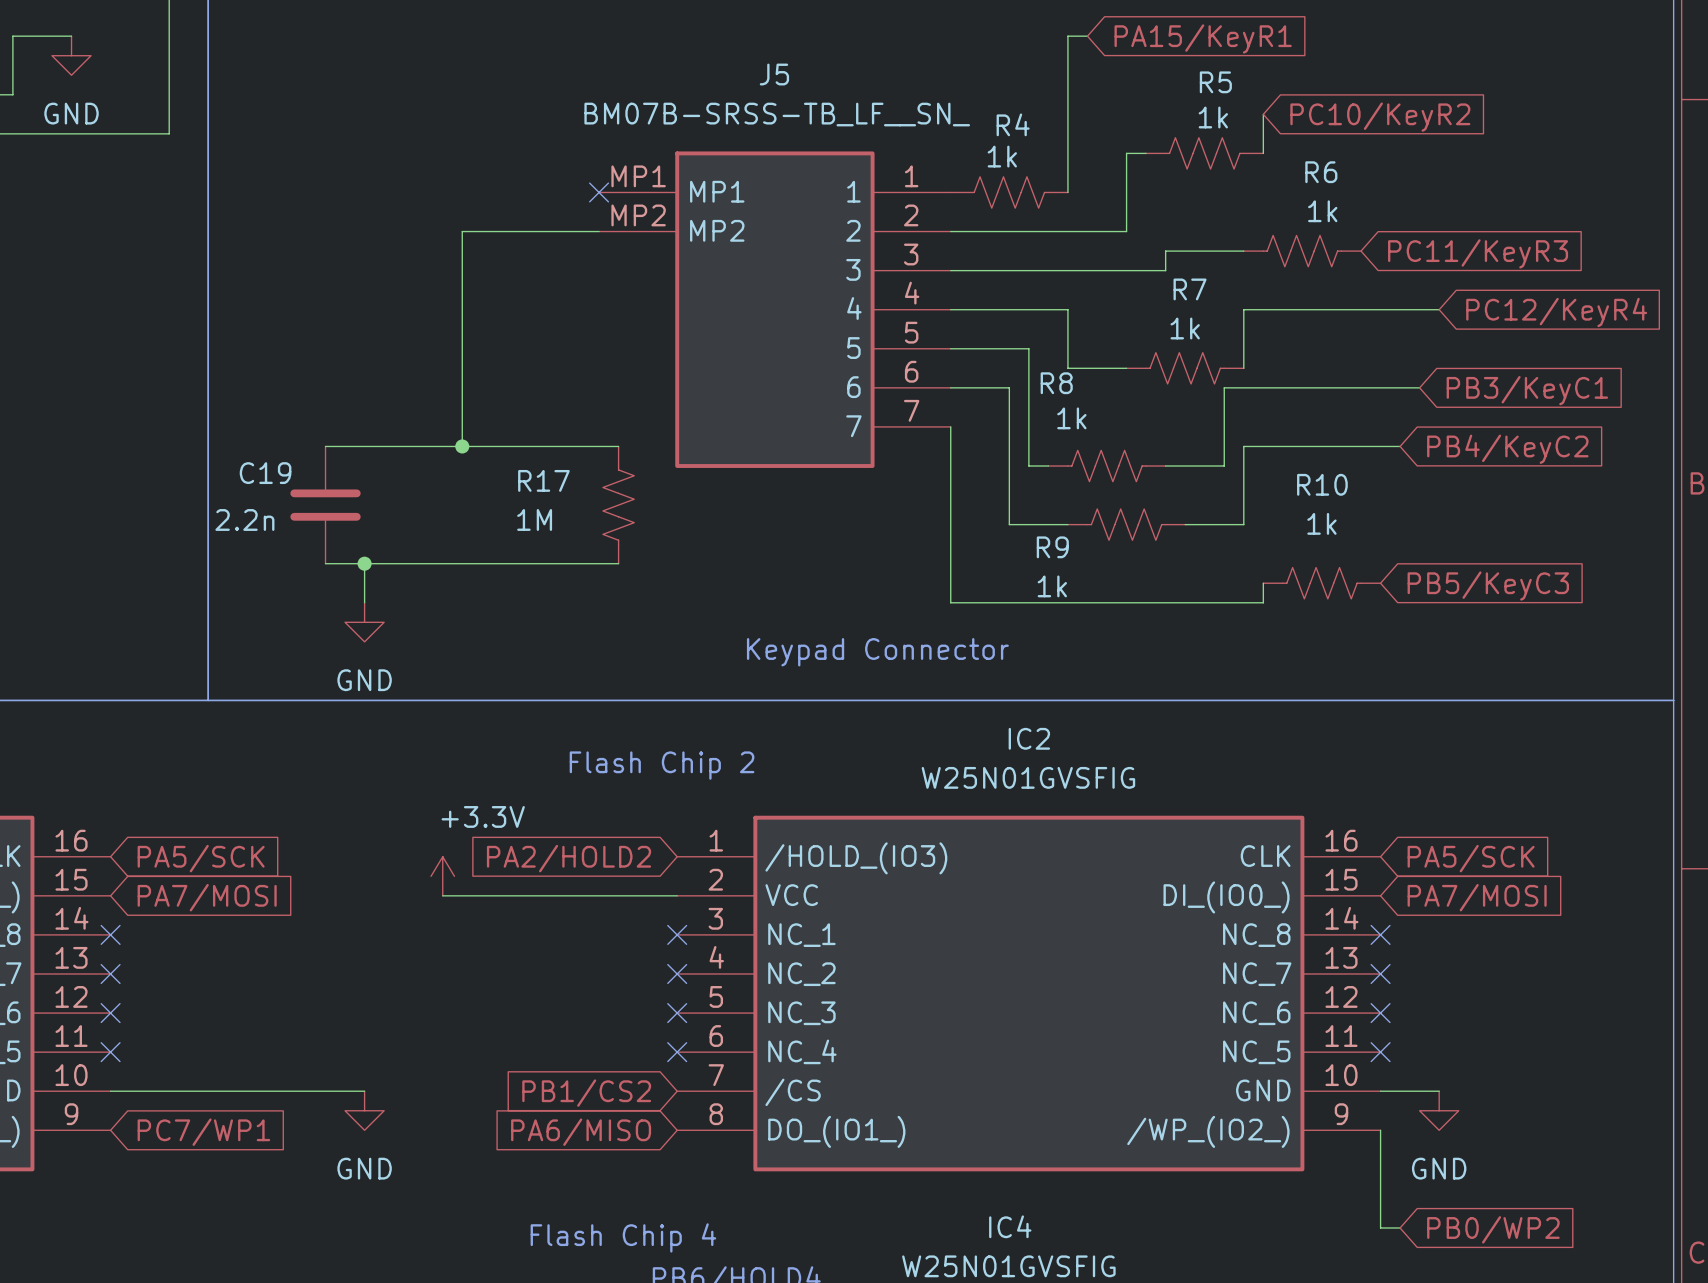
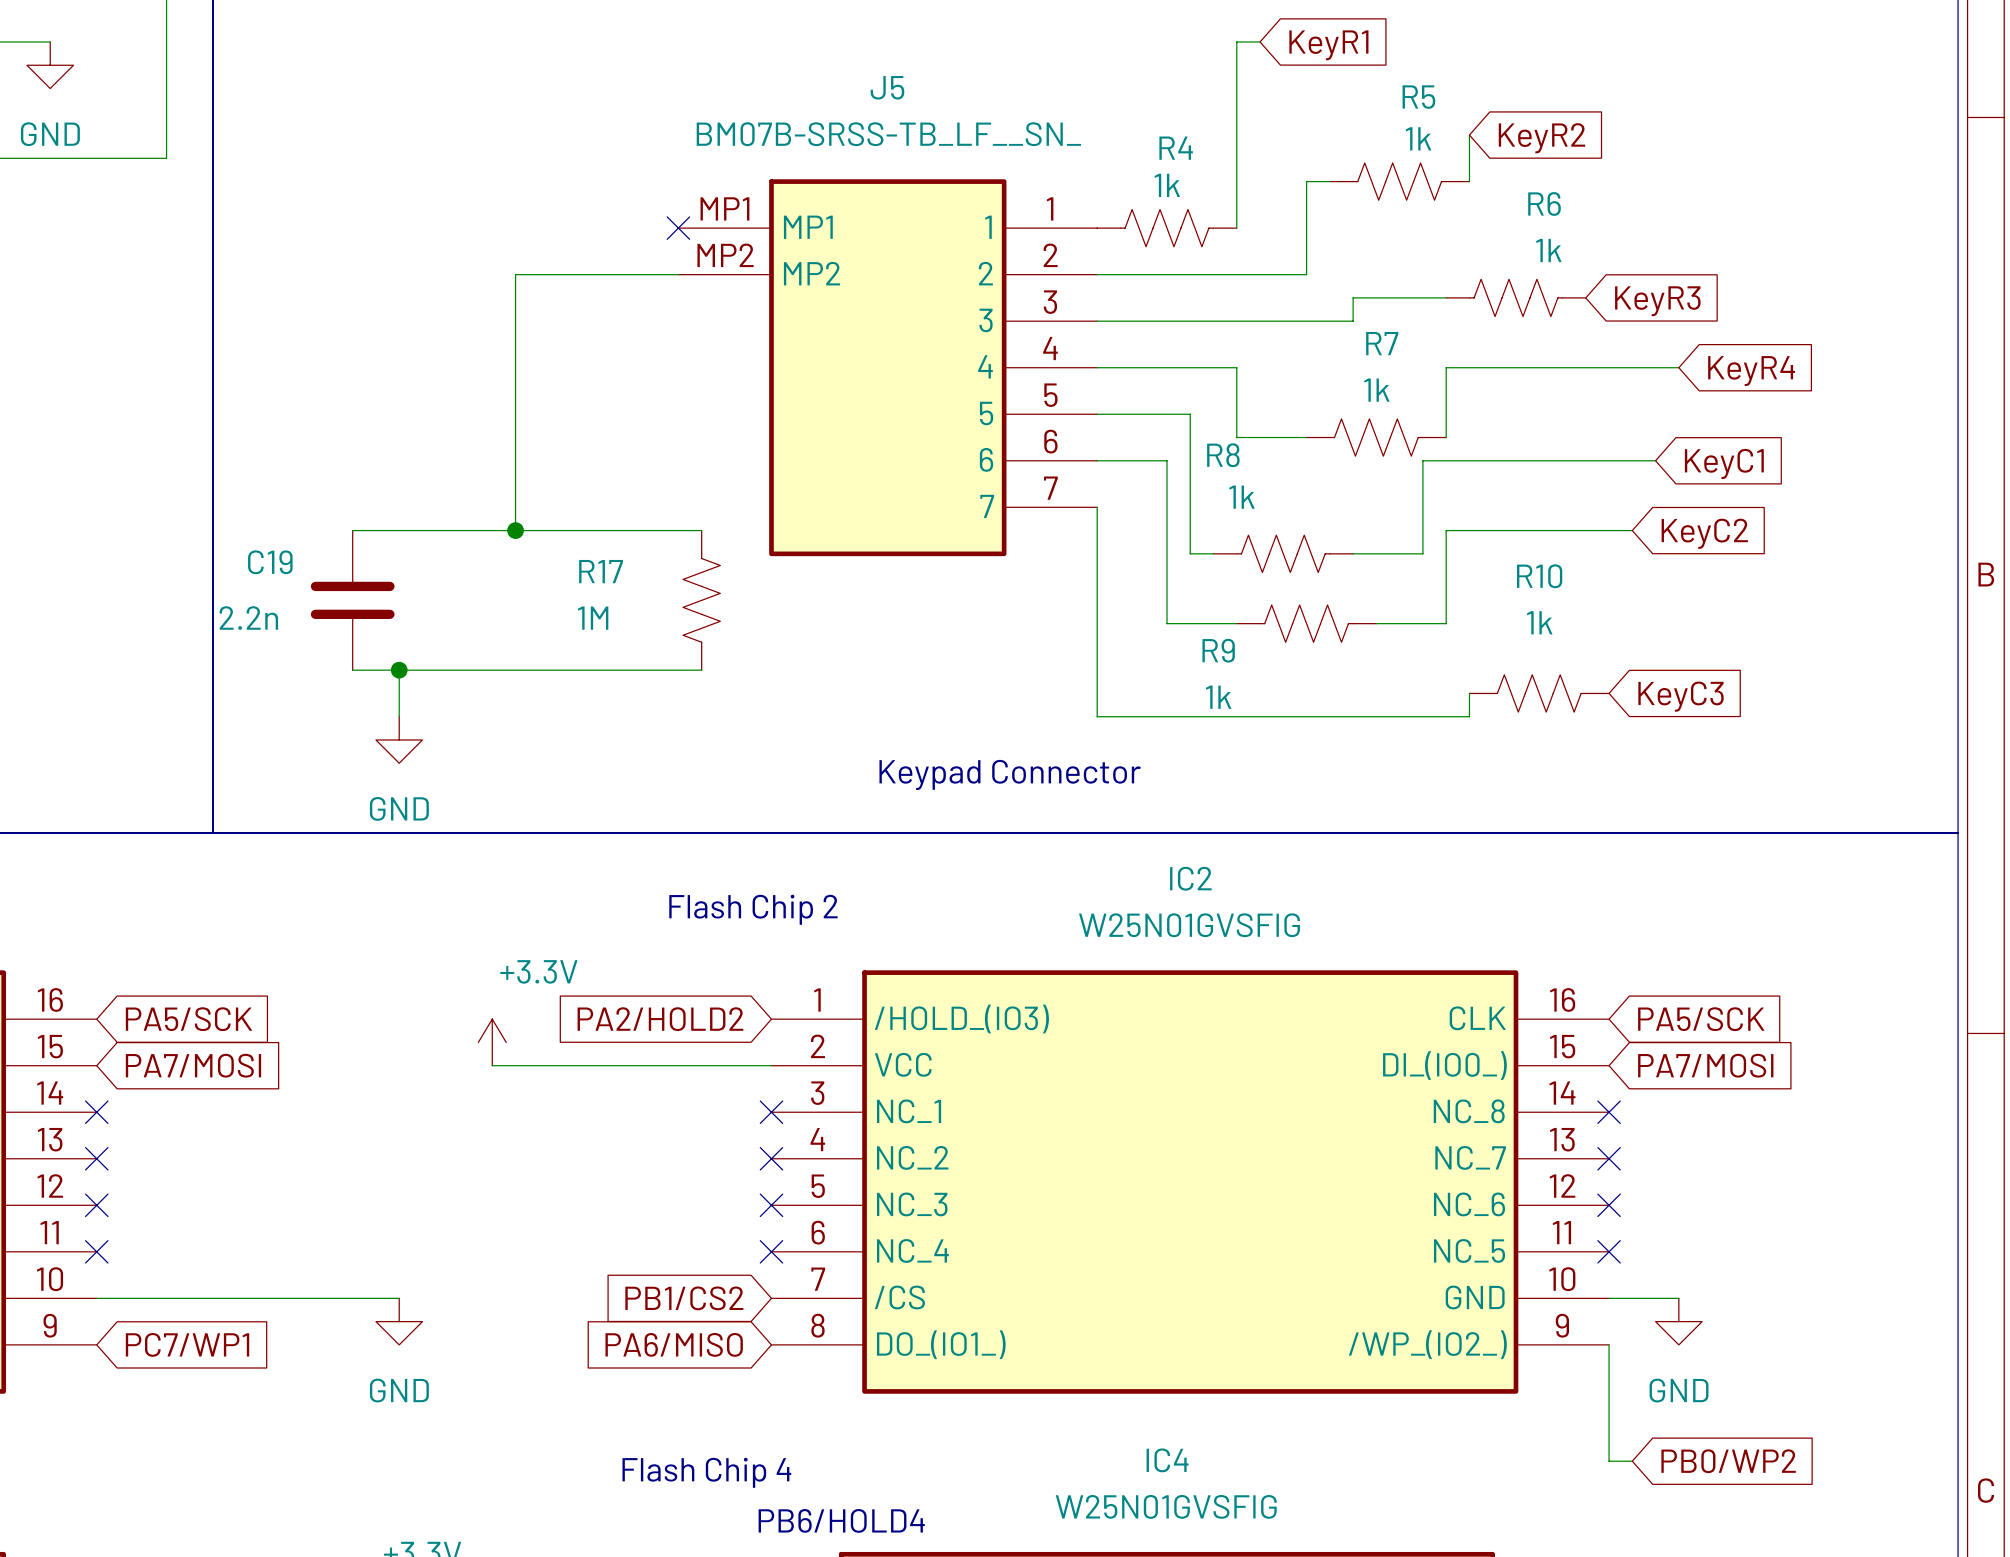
global label: PA15/KeyR1 (1203, 38) -> KeyR1 (1328, 45)
global label: PC10/KeyR2 (1380, 117) -> KeyR2 (1541, 138)
global label: PC11/KeyR3 (1478, 253) -> KeyR3 (1657, 301)
global label: PC12/KeyR4 (1556, 312) -> KeyR4 (1751, 371)
global label: PB3/KeyC1 (1527, 390) -> KeyC1 (1724, 463)
global label: PB4/KeyC2 (1507, 449) -> KeyC2 (1704, 533)
global label: PB5/KeyC3 (1488, 586) -> KeyC3 (1681, 696)

